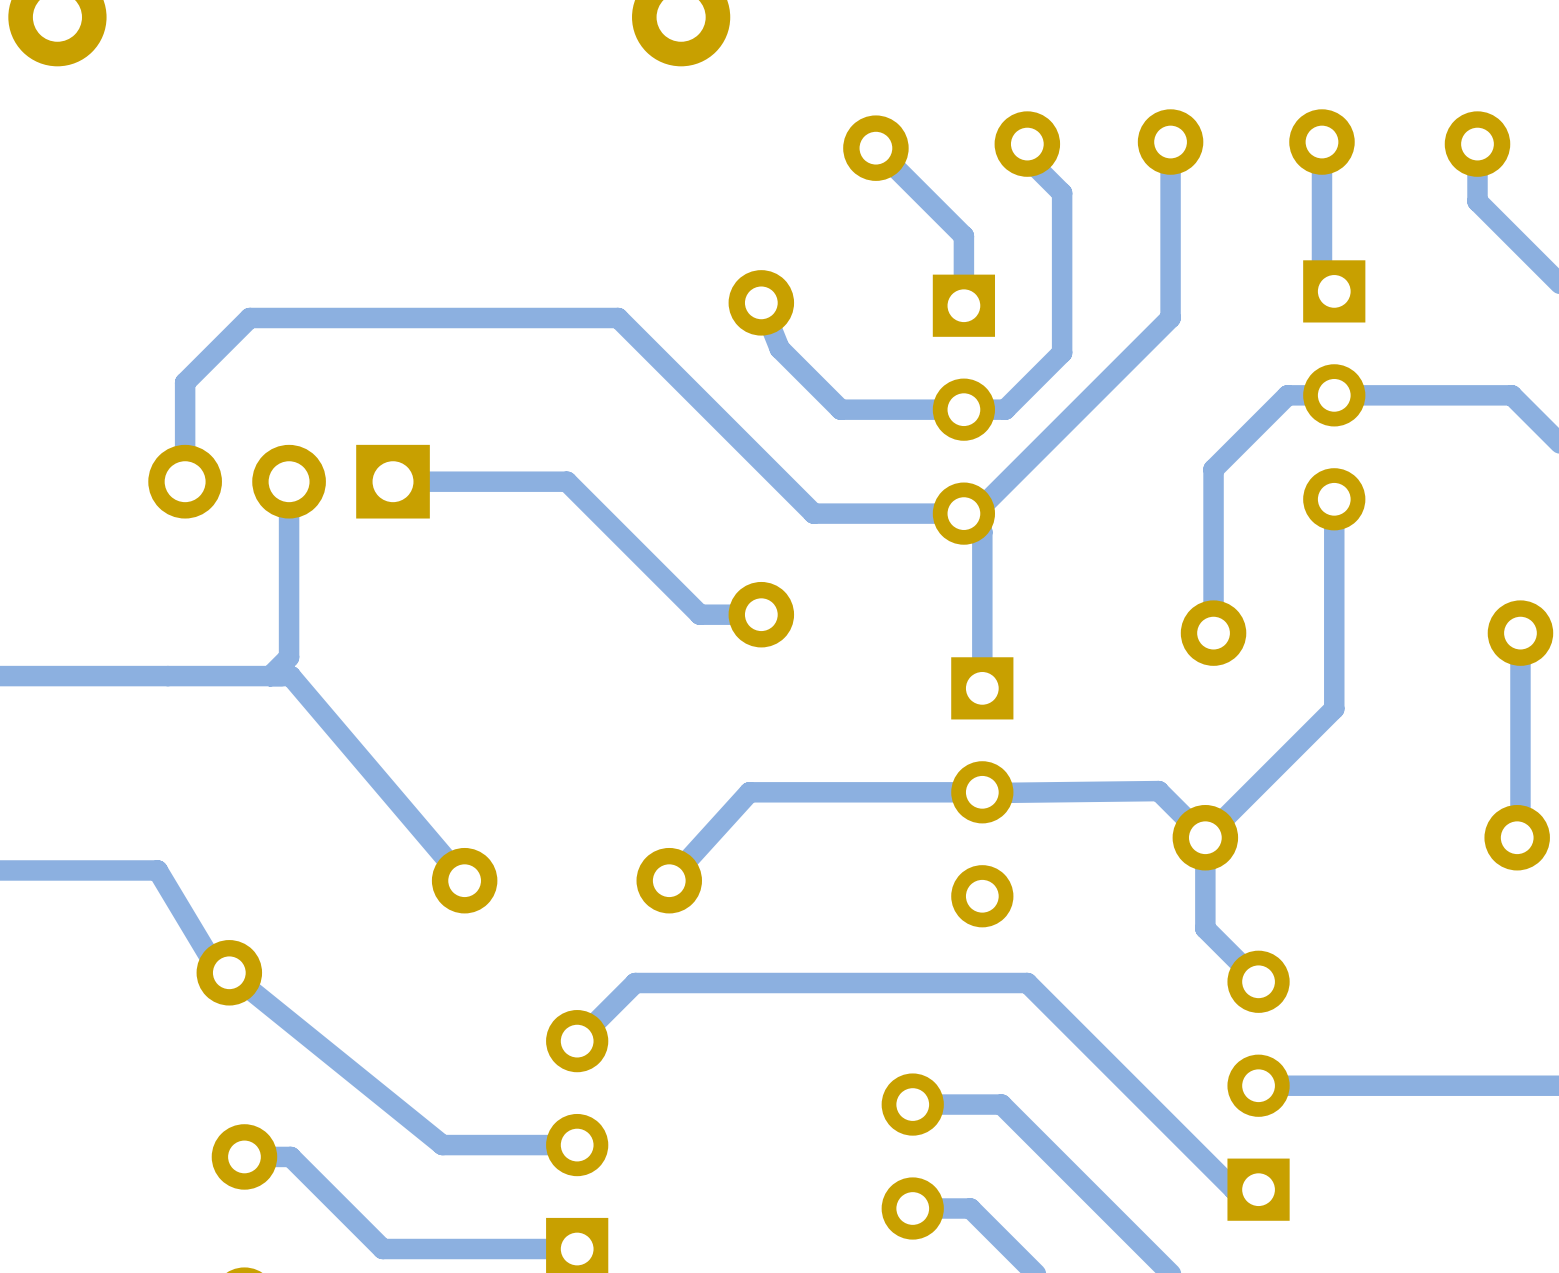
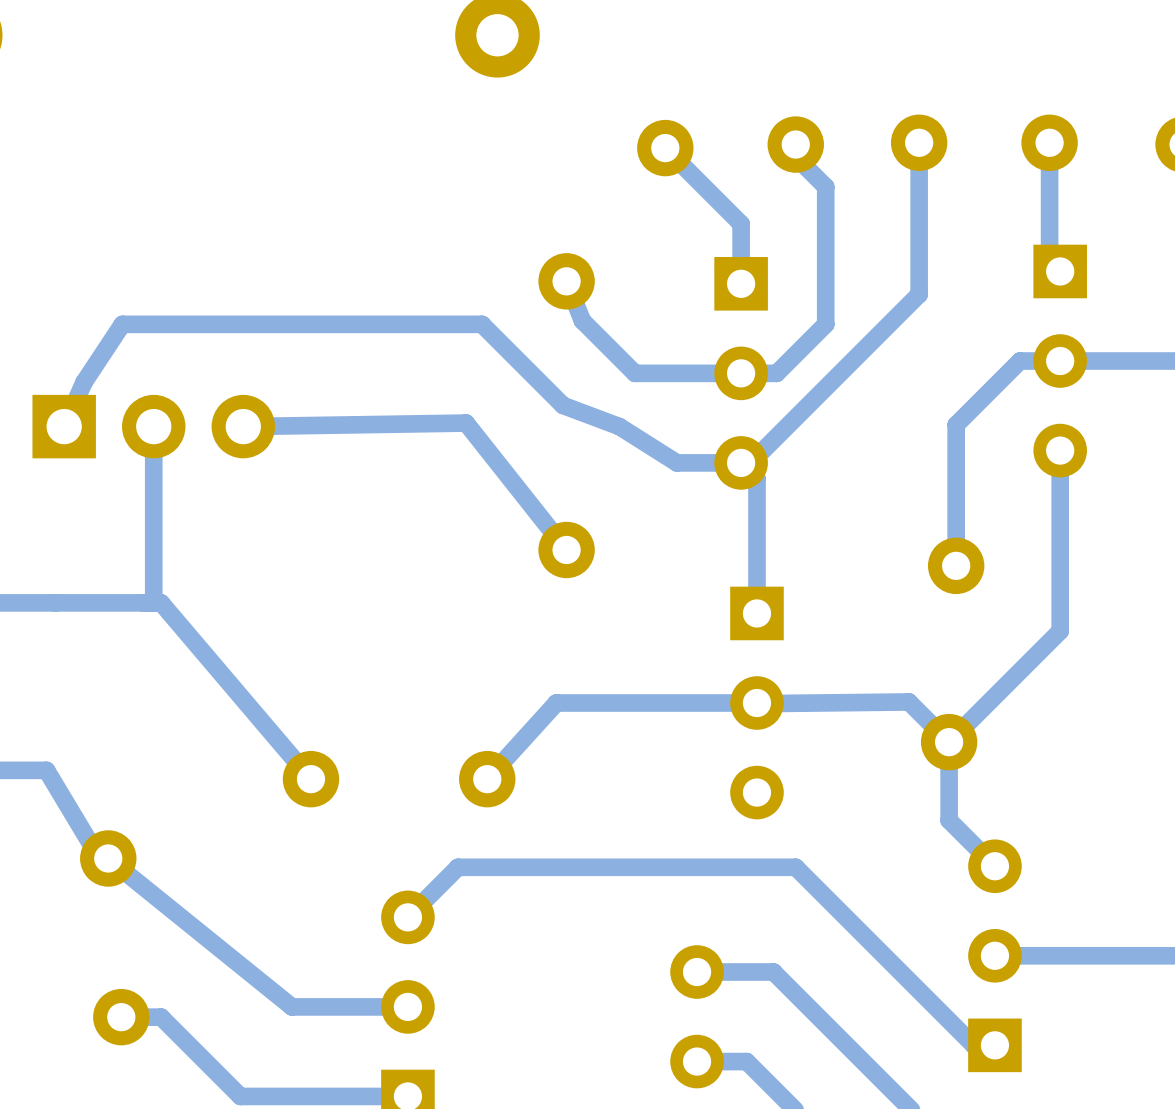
track: none -> (159, 432) (153, 426) (153, 602)
track: (185, 481) (185, 382) (249, 318) (618, 318) (813, 513) (889, 513) -> (64, 426) (84, 382) (122, 324) (481, 324) (563, 405) (619, 426) (676, 462)
track: (289, 481) (289, 657) (270, 676) -> none
part rotation: 0° (289, 481) -> 180° (153, 426)
track: (393, 481) (566, 481) (699, 614) (761, 614) -> (243, 426) (466, 423) (566, 549)

